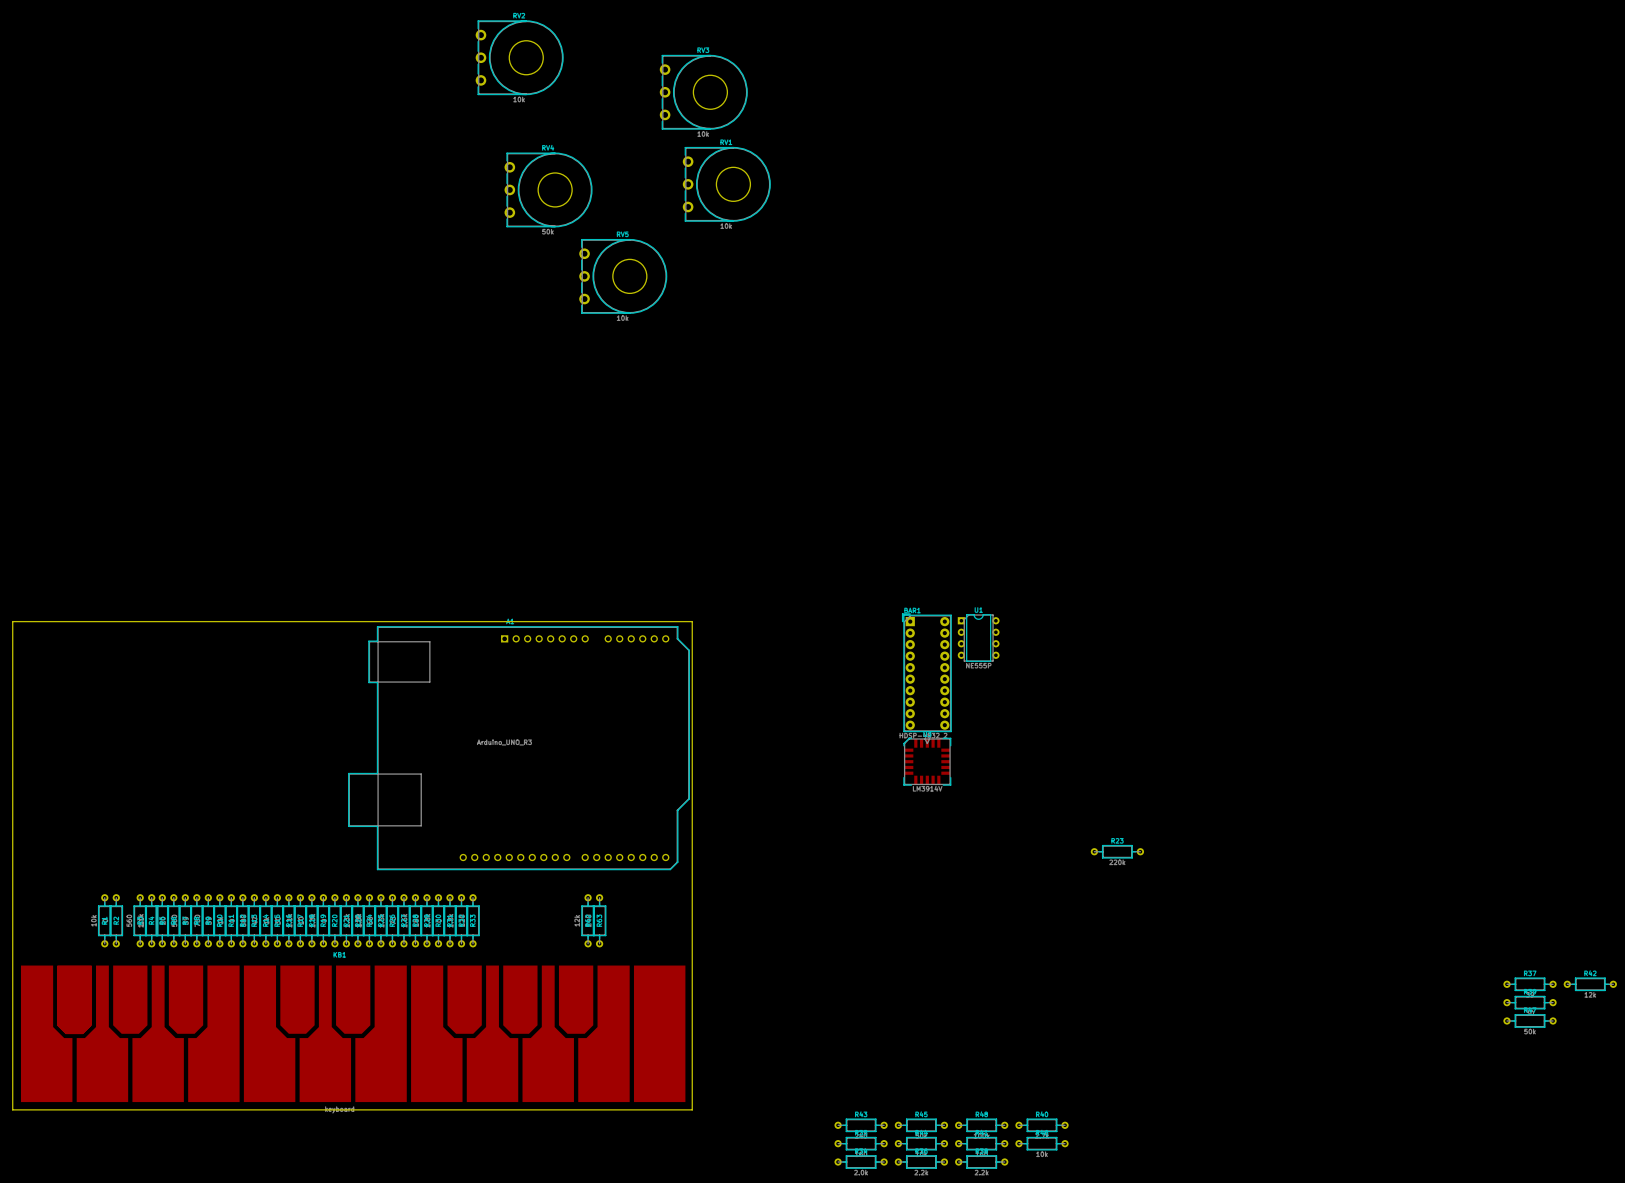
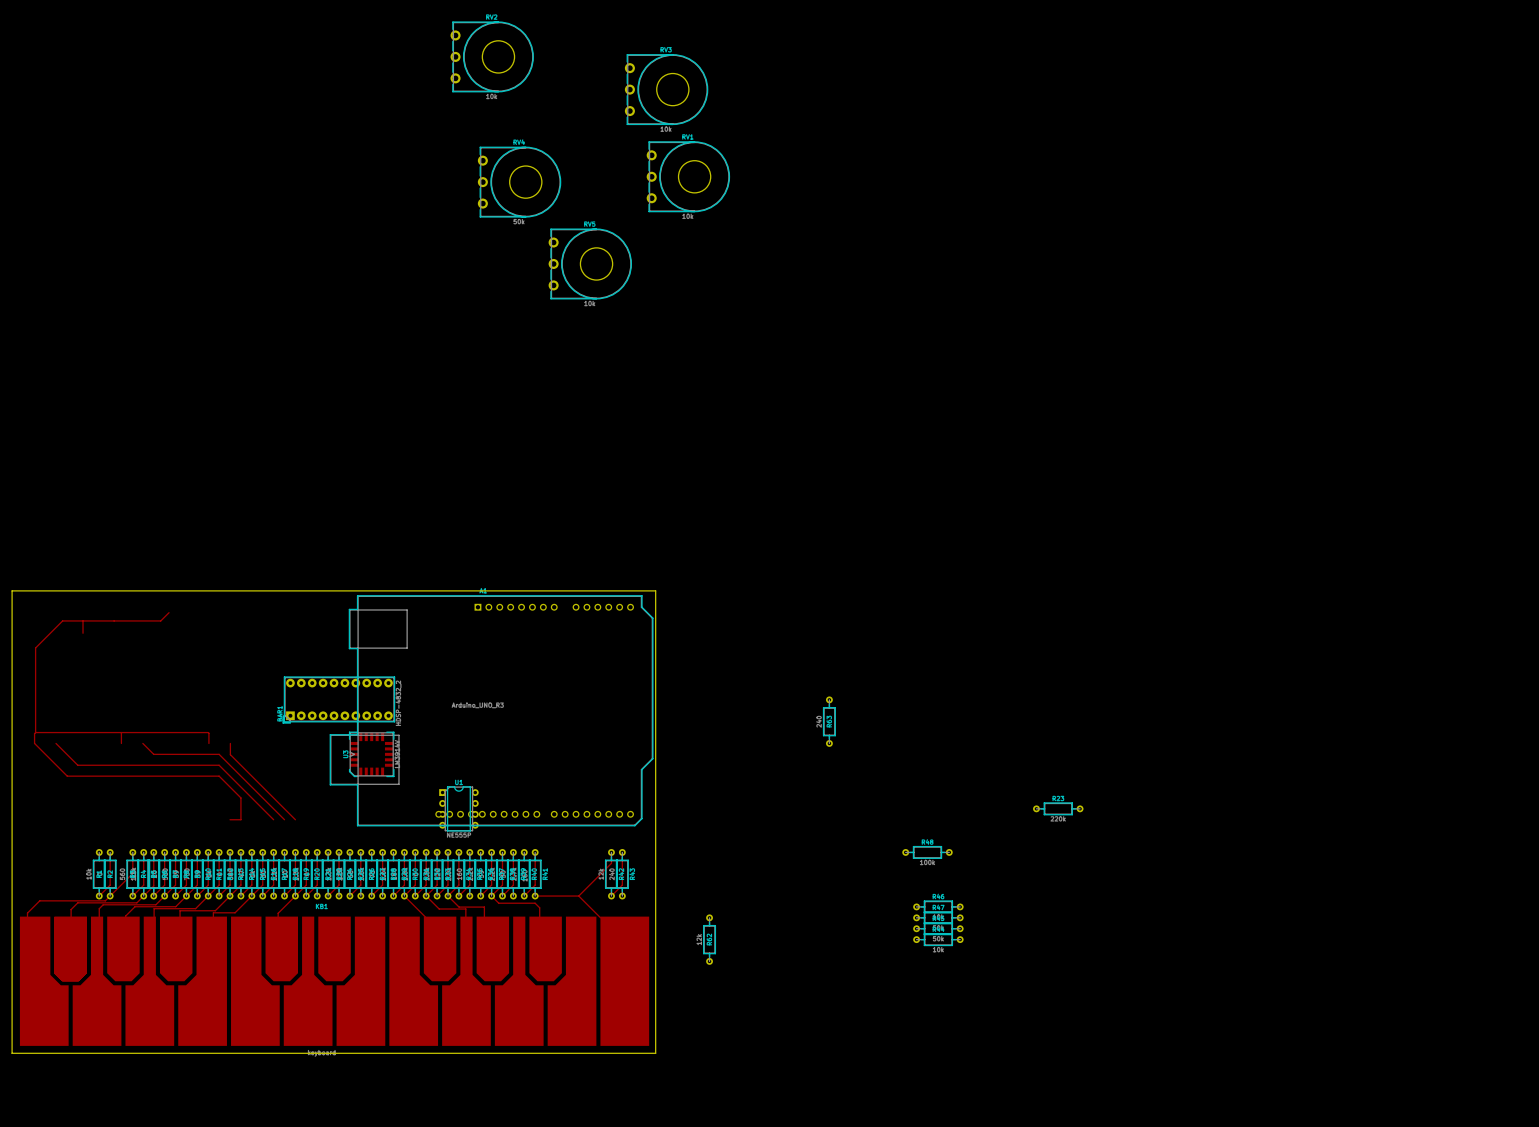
part position: (978, 638) -> (458, 808)
track: none -> (169, 612) (160, 620) (62, 620) (35, 647) (35, 732)
track: none -> (83, 620) (83, 633)
part rotation: 0° (926, 672) -> 90° counterclockwise (338, 700)
part position: (926, 672) -> (338, 700)
part rotation: 0° (927, 761) -> 90° counterclockwise (371, 754)
part position: (927, 761) -> (371, 754)
track: none -> (35, 732) (34, 743) (67, 776) (219, 776) (240, 797) (240, 819) (230, 819)
track: none -> (35, 732) (208, 732) (208, 743)
track: none -> (121, 732) (121, 743)
track: none -> (56, 743) (77, 765) (219, 765) (273, 819)
track: none -> (142, 743) (153, 754) (219, 754) (284, 819)
track: none -> (230, 743) (230, 754) (295, 819)
track: none -> (110, 852) (110, 885) (99, 896)
track: none -> (132, 852) (132, 873) (105, 900) (39, 900) (27, 913) (27, 1037)
track: none -> (143, 852) (143, 885) (132, 896)
track: none -> (153, 852) (153, 885) (136, 902) (77, 902) (71, 909) (71, 972)
track: none -> (164, 852) (164, 885) (153, 896)
track: none -> (175, 852) (175, 885) (155, 904) (103, 904) (99, 908) (99, 1020) (81, 1037)
track: none -> (186, 852) (186, 885) (175, 896)
track: none -> (197, 852) (197, 885) (175, 906) (135, 906) (125, 916) (125, 972)
track: none -> (208, 852) (208, 885) (197, 896)
track: none -> (219, 852) (219, 885) (195, 908) (154, 908) (154, 921) (151, 924)
track: none -> (230, 852) (230, 885) (219, 896)
track: none -> (240, 852) (240, 885) (215, 910) (180, 910) (180, 971)
track: none -> (251, 852) (251, 885) (240, 896)
track: none -> (262, 852) (262, 885) (235, 912) (213, 912) (213, 926)
track: none -> (273, 852) (273, 885) (262, 896)
track: none -> (295, 852) (295, 885) (284, 896)
track: none -> (306, 852) (306, 885) (278, 913) (278, 972)
track: none -> (317, 852) (317, 885) (306, 896)
track: none -> (339, 852) (339, 885) (328, 896)
track: none -> (360, 852) (360, 885) (349, 896)
track: none -> (382, 852) (382, 885) (371, 896)
track: none -> (404, 852) (404, 885) (393, 896)
track: none -> (415, 852) (415, 885) (404, 896) (430, 922) (430, 972)
track: none -> (426, 852) (426, 885) (415, 896)
track: none -> (437, 852) (437, 885) (426, 896) (439, 909) (465, 909) (465, 1024) (452, 1037)
track: none -> (447, 852) (447, 885) (437, 896)
track: none -> (458, 852) (458, 885) (447, 896) (459, 907) (484, 907) (485, 972)
track: none -> (469, 852) (469, 885) (458, 896)
track: none -> (491, 852) (491, 885) (480, 896)
track: none -> (502, 852) (502, 885) (491, 896) (498, 903) (535, 903) (539, 907) (539, 972)
track: none -> (513, 852) (513, 885) (502, 896)
track: none -> (535, 852) (535, 885) (524, 896)
track: none -> (611, 852) (611, 863) (578, 896)
track: none -> (622, 852) (622, 885) (611, 896)
part position: (588, 920) -> (709, 939)
part position: (599, 920) -> (829, 721)
track: none -> (535, 896) (578, 896)
track: none -> (578, 896) (600, 917)
part rotation: 0° (1530, 984) -> 90° clockwise (491, 874)
part position: (1530, 984) -> (491, 874)
part rotation: 0° (1590, 984) -> 90° clockwise (611, 874)
part position: (1590, 984) -> (611, 874)
part rotation: 0° (1530, 1002) -> 90° clockwise (513, 874)
part position: (1530, 1002) -> (513, 874)
part position: (1530, 1020) -> (938, 917)
part rotation: 0° (861, 1125) -> 90° clockwise (622, 874)
part position: (861, 1125) -> (622, 874)
part position: (921, 1125) -> (938, 928)
part position: (981, 1125) -> (927, 852)
part rotation: 0° (1042, 1125) -> 90° clockwise (524, 874)
part position: (1042, 1125) -> (524, 874)
part rotation: 0° (861, 1143) -> 90° clockwise (469, 874)
part position: (861, 1143) -> (469, 874)
part position: (921, 1143) -> (938, 939)
part rotation: 0° (981, 1143) -> 90° clockwise (535, 874)
part position: (981, 1143) -> (535, 874)
part position: (1042, 1143) -> (938, 906)
part rotation: 0° (861, 1162) -> 90° clockwise (458, 874)
part position: (861, 1162) -> (458, 874)
part rotation: 0° (921, 1162) -> 90° clockwise (480, 874)
part position: (921, 1162) -> (480, 874)
part rotation: 0° (981, 1162) -> 90° clockwise (502, 874)
part position: (981, 1162) -> (502, 874)

